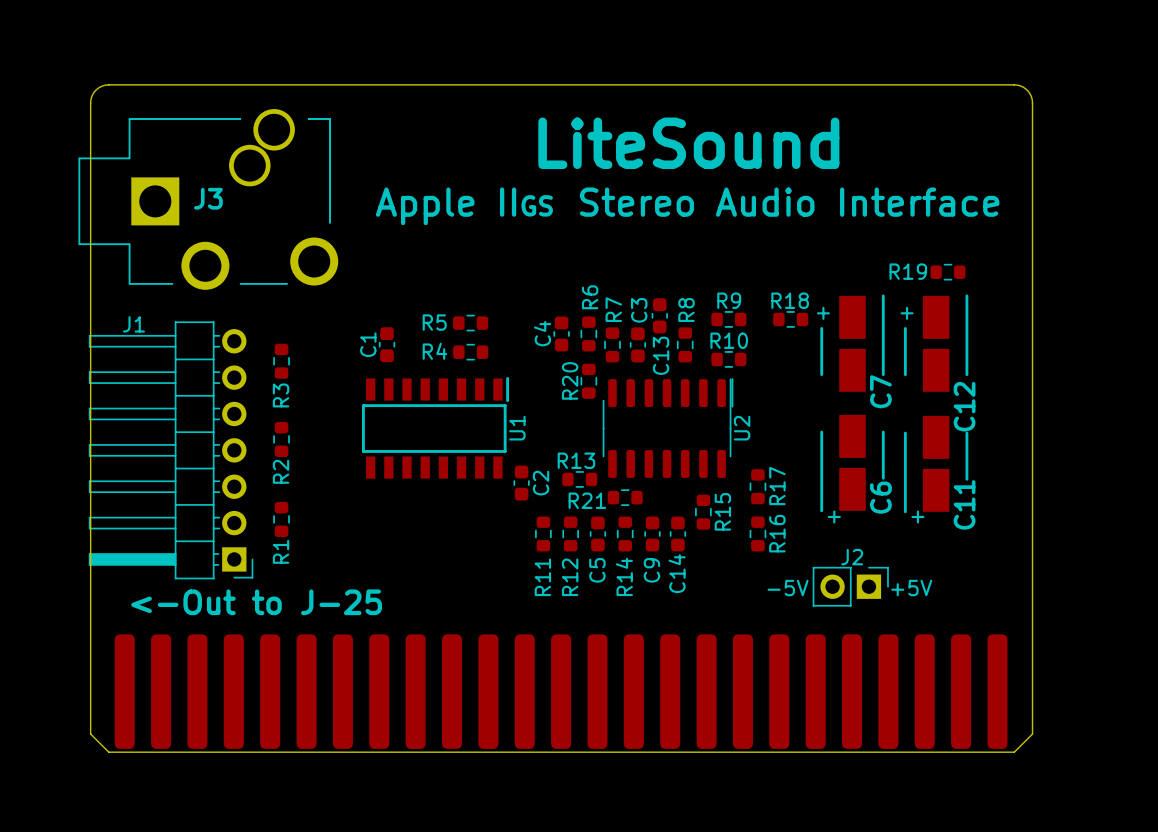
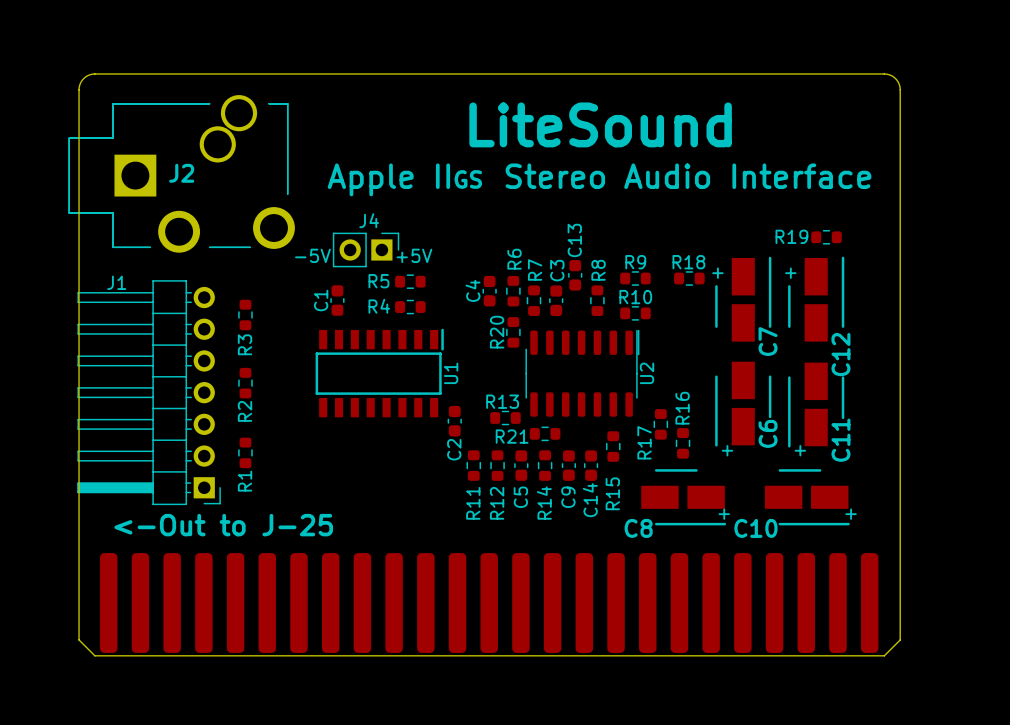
J3 name: J3 (208, 198) -> J2 (181, 173)
J4: none -> (366, 249)
text: none -> -5V (312, 255)
text: none -> +5V (414, 255)
C13 name position: C13 (661, 355) -> C13 (574, 240)
C2 name position: C2 (541, 483) -> C2 (454, 449)
R17 name position: R17 (777, 486) -> R17 (644, 442)
R15 name position: R15 (722, 511) -> R15 (612, 493)
R16 position: (757, 533) -> (683, 443)
R16 name position: R16 (777, 533) -> R16 (682, 408)
C8: none -> (683, 497)
C10: none -> (807, 497)
J2: (850, 586) -> none
text: -5V (788, 588) -> none
text: +5V (911, 588) -> none
text: none -> + (724, 514)
text: none -> + (851, 514)

